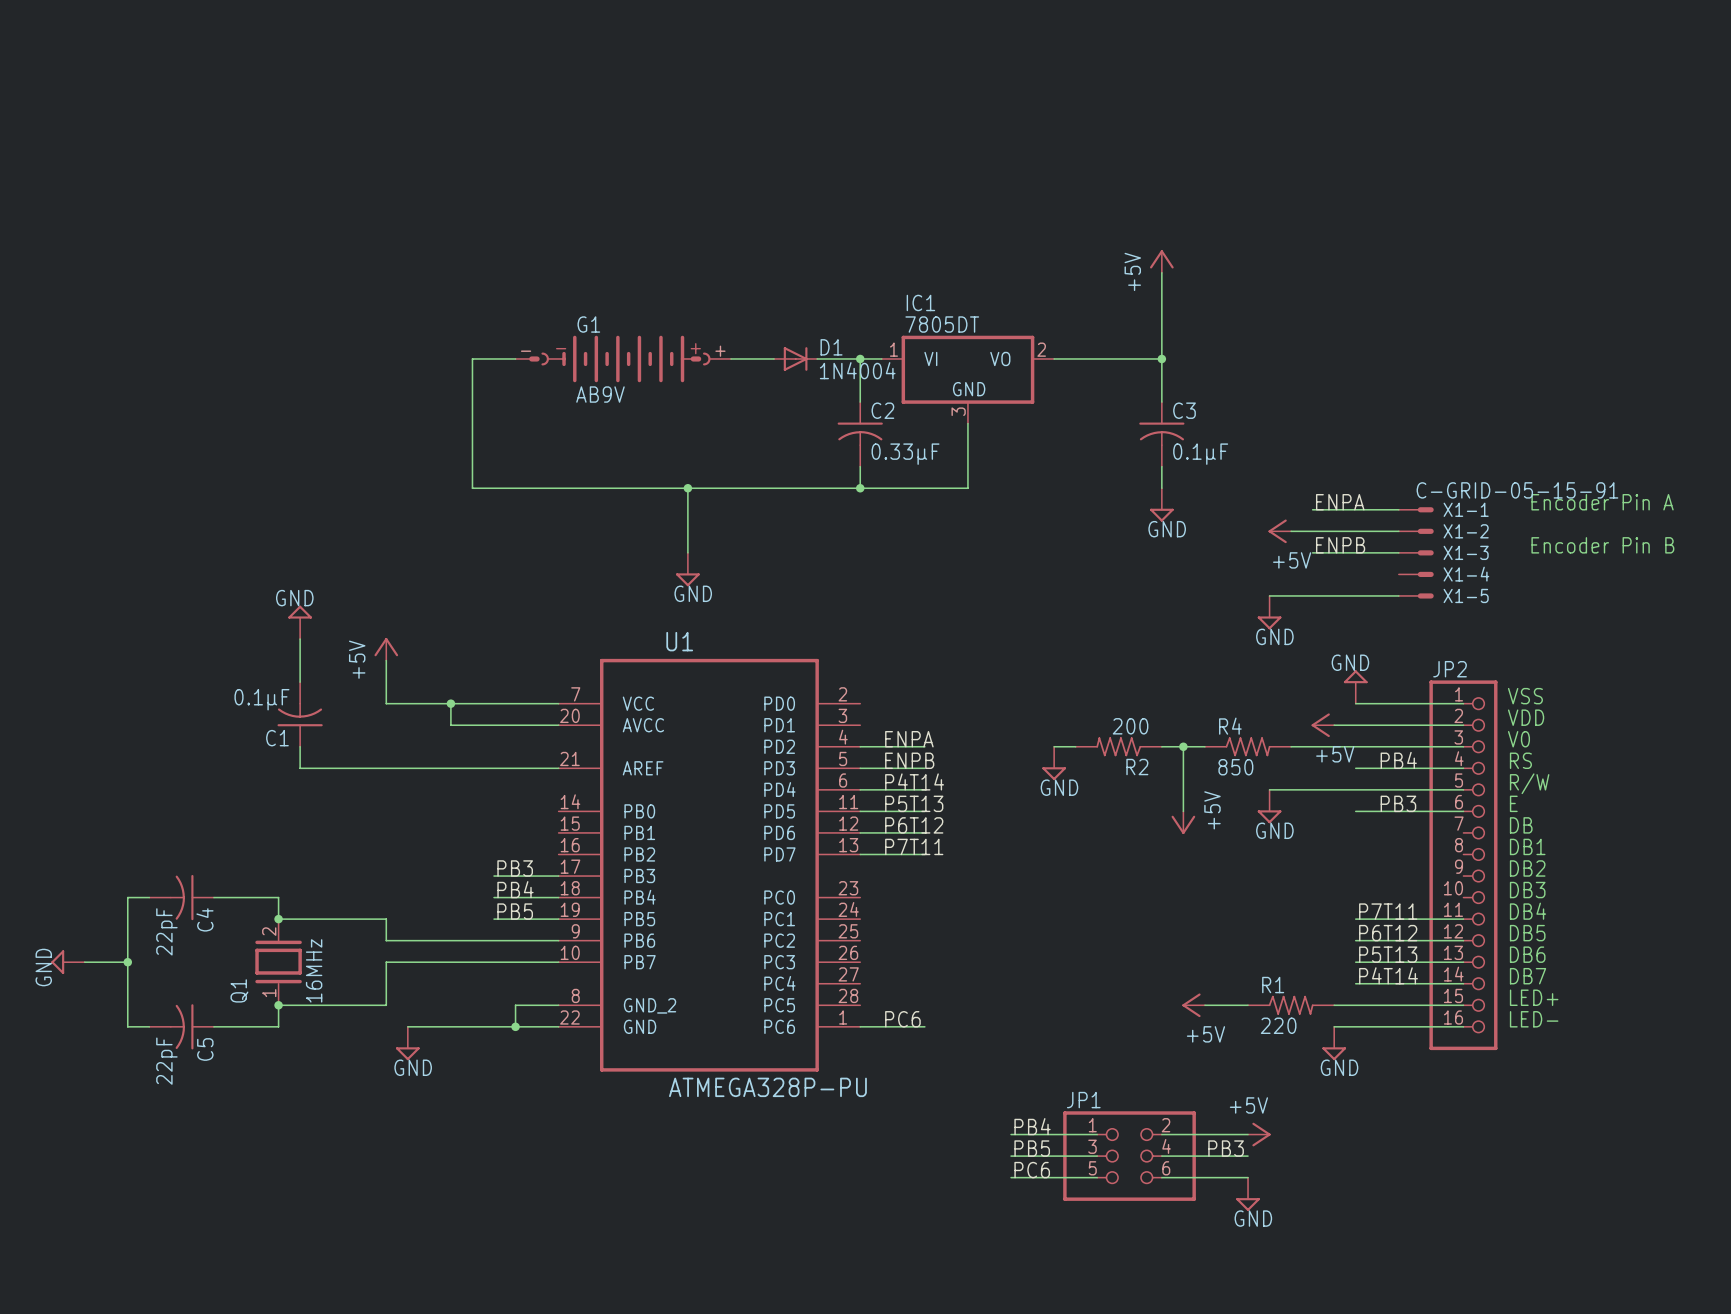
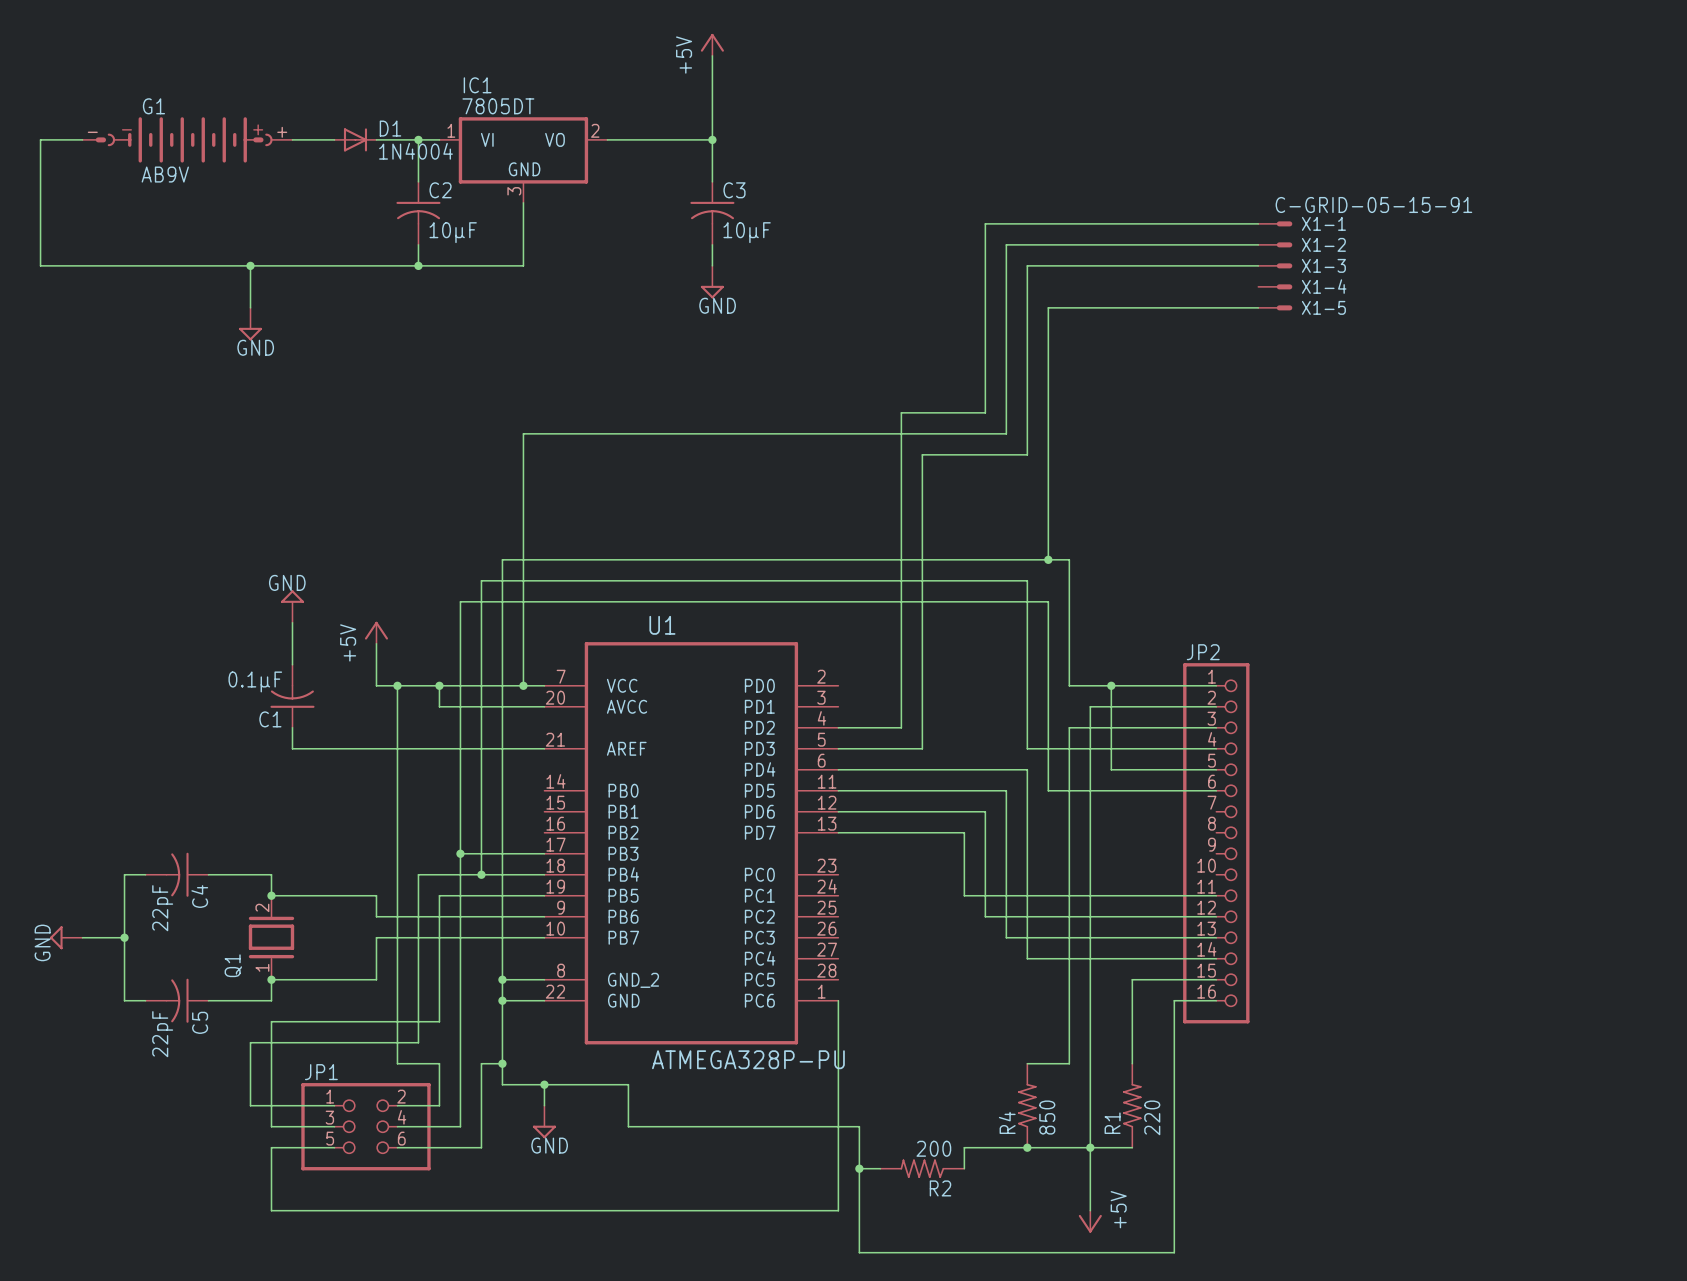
power symbol: none -> +5V (712, 44)
wire: none -> (712, 55) (712, 181)
wire: none -> (82, 139) (40, 139) (40, 265) (523, 265) (523, 202)
wire: none -> (292, 139) (334, 139)
wire: none -> (376, 139) (439, 139)
wire: none -> (418, 139) (418, 181)
junction: none -> (418, 139)
wire: none -> (607, 139) (712, 139)
junction: none -> (712, 139)
wire: none -> (1258, 223) (985, 223) (985, 412) (901, 412) (901, 727)
wire: none -> (418, 244) (418, 265)
wire: none -> (712, 244) (712, 265)
wire: none -> (1258, 244) (1006, 244) (1006, 433) (523, 433) (523, 685)
power symbol: +5V (1161, 261) -> none
wire: none -> (250, 265) (250, 307)
junction: none -> (250, 265)
junction: none -> (418, 265)
wire: (1161, 272) (1161, 402) -> none
wire: none -> (1258, 265) (1027, 265) (1027, 454) (922, 454) (922, 748) (901, 748)
power symbol: none -> GND (712, 282)
wire: none -> (1258, 307) (1048, 307) (1048, 559)
power symbol: none -> GND (250, 324)
wire: (515, 358) (472, 358) (472, 488) (967, 488) (967, 423) -> none
G1 position: (623, 358) -> (187, 139)
wire: (730, 358) (774, 358) -> none
D1 position: (795, 358) -> (355, 139)
wire: (817, 358) (881, 358) -> none
wire: (860, 358) (860, 402) -> none
junction: (860, 358) -> none
wire: (1054, 358) (1161, 358) -> none
junction: (1161, 358) -> none
IC1 position: (967, 379) -> (523, 160)
C2 position: (860, 434) -> (418, 213)
C3 position: (1161, 434) -> (712, 213)
C2 value: 0.33µF (905, 454) -> 10µF (453, 232)
C3 value: 0.1µF (1200, 454) -> 10µF (747, 232)
wire: (860, 466) (860, 488) -> none
wire: (1161, 466) (1161, 488) -> none
wire: (687, 488) (687, 552) -> none
junction: (687, 488) -> none
junction: (860, 488) -> none
label: ENPA (1340, 502) -> none
text: Encoder Pin A (1602, 502) -> none
power symbol: GND (1161, 504) -> none
wire: (1312, 509) (1398, 509) -> none
X1-1 position: (1416, 509) -> (1275, 223)
power symbol: +5V (1279, 531) -> none
wire: (1291, 531) (1398, 531) -> none
X1-2 position: (1416, 531) -> (1275, 244)
label: ENPB (1340, 545) -> none
text: Encoder Pin B (1602, 545) -> none
wire: (1312, 552) (1398, 552) -> none
X1-3 position: (1416, 552) -> (1275, 265)
power symbol: GND (687, 569) -> none
junction: none -> (1048, 559)
X1-4 position: (1416, 574) -> (1275, 286)
wire: (1269, 595) (1398, 595) -> none
X1-5 position: (1416, 595) -> (1275, 307)
power symbol: GND (1269, 612) -> none
power symbol: GND (1355, 686) -> none
text: VSS (1525, 696) -> none
wire: none -> (397, 685) (397, 1063) (439, 1063) (439, 1105) (397, 1105)
junction: none -> (397, 685)
junction: none -> (523, 685)
wire: none -> (1111, 685) (1111, 769) (1216, 769)
junction: none -> (1111, 685)
wire: none -> (1216, 685) (1069, 685) (1069, 559) (502, 559) (502, 979)
wire: (1355, 703) (1463, 703) -> none
text: VDD (1526, 717) -> none
wire: none -> (1216, 706) (1090, 706) (1090, 1210)
power symbol: +5V (1322, 725) -> none
wire: (1334, 725) (1463, 725) -> none
label: ENPA (909, 739) -> none
text: V0 (1518, 739) -> none
wire: (1054, 746) (1075, 746) -> none
R2 position: (1118, 746) -> (922, 1168)
wire: none -> (1132, 727) (1069, 727) (1069, 1063) (1027, 1063)
wire: (1183, 746) (1183, 811) -> none
junction: (1183, 746) -> none
R4 rotation: 0° (1248, 746) -> 90° counterclockwise (1027, 1105)
R4 position: (1248, 746) -> (1027, 1105)
wire: (1291, 746) (1463, 746) -> none
label: ENPB (909, 760) -> none
label: PB4 (1398, 760) -> none
text: RS (1520, 760) -> none
power symbol: GND (1054, 763) -> none
wire: none -> (1216, 748) (1027, 748) (1027, 580) (481, 580) (481, 874) (418, 874) (418, 1042) (250, 1042) (250, 1105) (334, 1105)
wire: (1355, 768) (1463, 768) -> none
label: P4T14 (914, 781) -> none
text: R/W (1529, 783) -> none
wire: none -> (901, 769) (1027, 769) (1027, 958) (1216, 958)
wire: (1269, 789) (1463, 789) -> none
label: P5T13 (914, 803) -> none
label: PB3 (1398, 803) -> none
text: E (1513, 803) -> none
power symbol: GND (1269, 806) -> none
wire: none -> (901, 790) (1006, 790) (1006, 937) (1216, 937)
wire: none -> (1216, 790) (1048, 790) (1048, 601) (460, 601) (460, 1126) (397, 1126)
wire: (1355, 811) (1463, 811) -> none
power symbol: +5V (1183, 822) -> none
label: P6T12 (914, 825) -> none
text: DB (1521, 825) -> none
wire: none -> (901, 811) (985, 811) (985, 916) (1216, 916)
label: P7T11 (914, 846) -> none
text: DB1 (1527, 846) -> none
wire: none -> (901, 832) (964, 832) (964, 895) (1216, 895)
JP2 position: (1463, 865) -> (1216, 843)
label: PB3 (515, 868) -> none
text: DB2 (1527, 868) -> none
wire: none -> (460, 853) (481, 853)
junction: none -> (460, 853)
label: PB4 (515, 889) -> none
text: DB3 (1527, 890) -> none
junction: none -> (481, 874)
label: PB5 (515, 911) -> none
label: P7T11 (1388, 911) -> none
text: DB4 (1528, 911) -> none
wire: none -> (481, 895) (439, 895) (439, 1021) (271, 1021) (271, 1126) (334, 1126)
wire: (1355, 919) (1463, 919) -> none
label: P6T12 (1388, 933) -> none
text: DB5 (1527, 933) -> none
wire: (1355, 940) (1463, 940) -> none
label: P5T13 (1388, 954) -> none
text: DB6 (1527, 954) -> none
wire: (1355, 962) (1463, 962) -> none
Q1 value: 16MHz (314, 970) -> none
label: P4T14 (1388, 975) -> none
text: DB7 (1528, 976) -> none
wire: (1355, 983) (1463, 983) -> none
text: LED+ (1534, 997) -> none
junction: none -> (502, 979)
power symbol: +5V (1193, 1005) -> none
wire: none -> (1174, 979) (1132, 979) (1132, 1063)
R1 rotation: 0° (1291, 1005) -> 90° counterclockwise (1132, 1105)
R1 position: (1291, 1005) -> (1132, 1105)
wire: (1334, 1005) (1463, 1005) -> none
label: PC6 (902, 1019) -> none
text: LED- (1534, 1019) -> none
wire: (407, 1026) (515, 1026) -> (1216, 1000) (1174, 1000) (1174, 1252) (859, 1252) (859, 1126) (628, 1126) (628, 1084) (502, 1084) (502, 1000)
wire: (860, 1026) (924, 1026) -> (838, 1000) (838, 1210) (271, 1210) (271, 1147) (334, 1147)
wire: (1334, 1026) (1463, 1026) -> none
power symbol position: GND (407, 1043) -> GND (544, 1121)
power symbol: GND (1334, 1043) -> none
wire: none -> (502, 1063) (481, 1063) (481, 1147) (397, 1147)
junction: none -> (502, 1063)
wire: none -> (544, 1084) (544, 1105)
junction: none -> (544, 1084)
label: PB4 (1032, 1126) -> none
wire: (1011, 1134) (1097, 1134) -> none
wire: (1161, 1134) (1248, 1134) -> none
power symbol: +5V (1259, 1134) -> none
label: PB5 (1032, 1148) -> none
label: PB3 (1226, 1148) -> none
wire: (1011, 1156) (1097, 1156) -> none
JP1 position: (1129, 1156) -> (365, 1126)
wire: (1161, 1156) (1248, 1156) -> none
label: PC6 (1032, 1170) -> none
wire: none -> (985, 1147) (964, 1147) (964, 1168)
junction: none -> (1027, 1147)
junction: none -> (1090, 1147)
wire: (1161, 1177) (1248, 1177) -> (1132, 1147) (1069, 1147)
power symbol: GND (1248, 1194) -> none
wire: none -> (859, 1168) (880, 1168)
junction: none -> (859, 1168)
power symbol: none -> +5V (1090, 1221)

